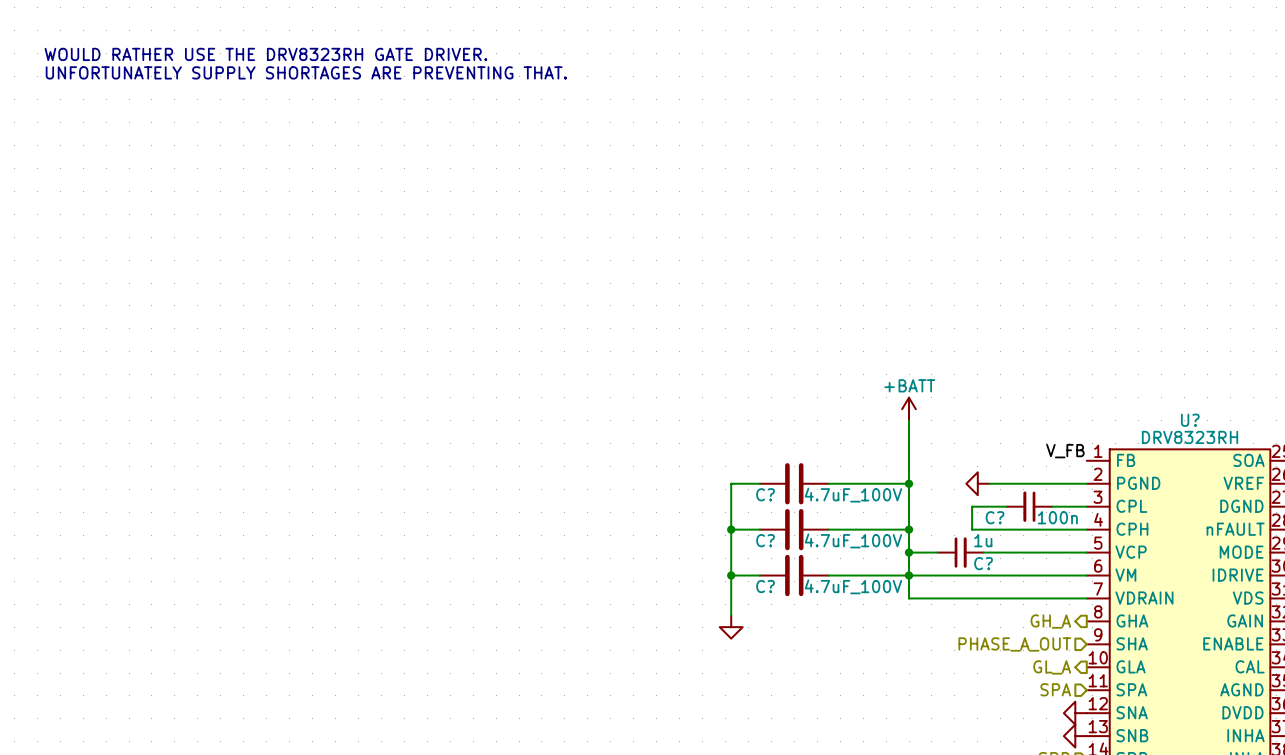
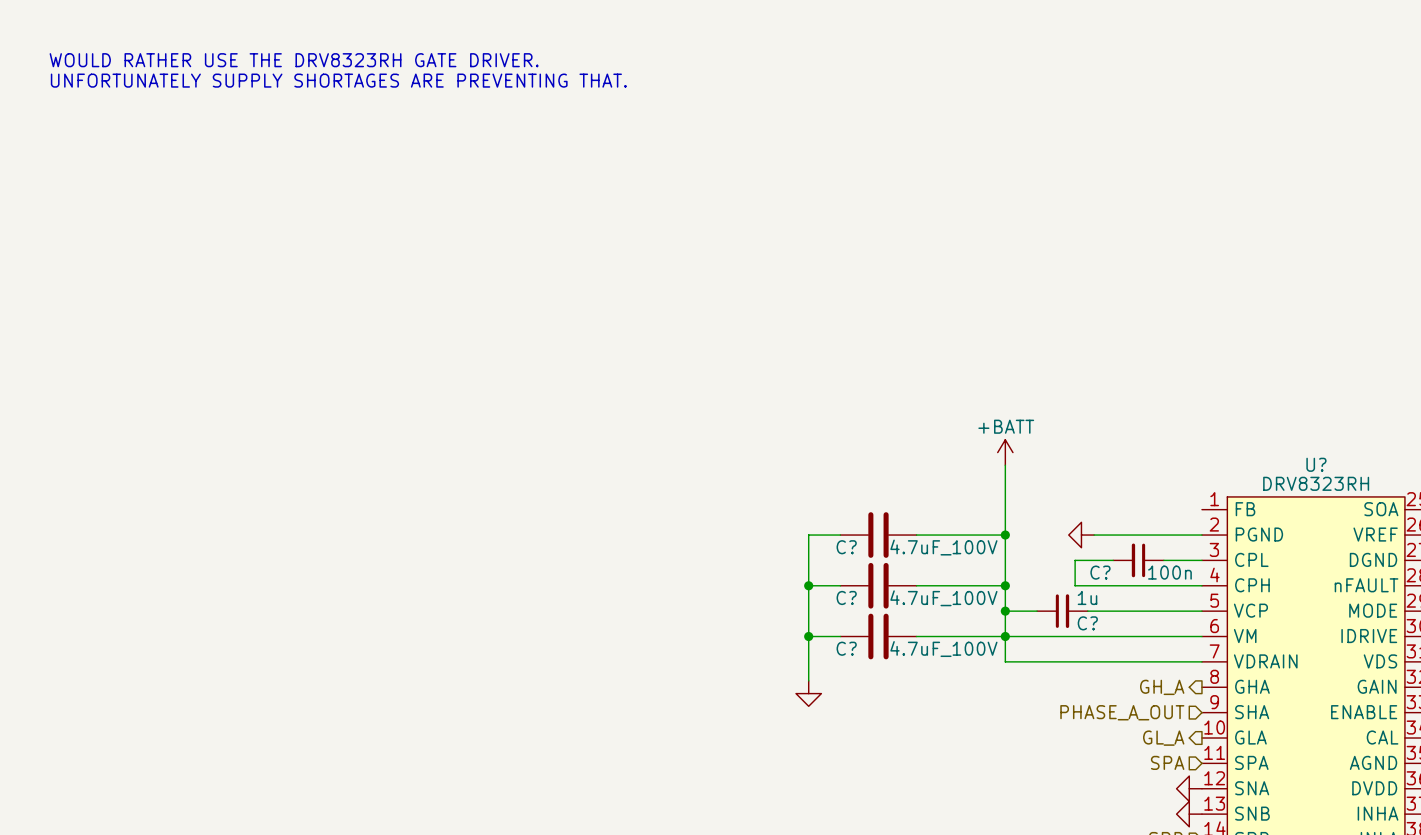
label: V_FB (1065, 451) -> none

